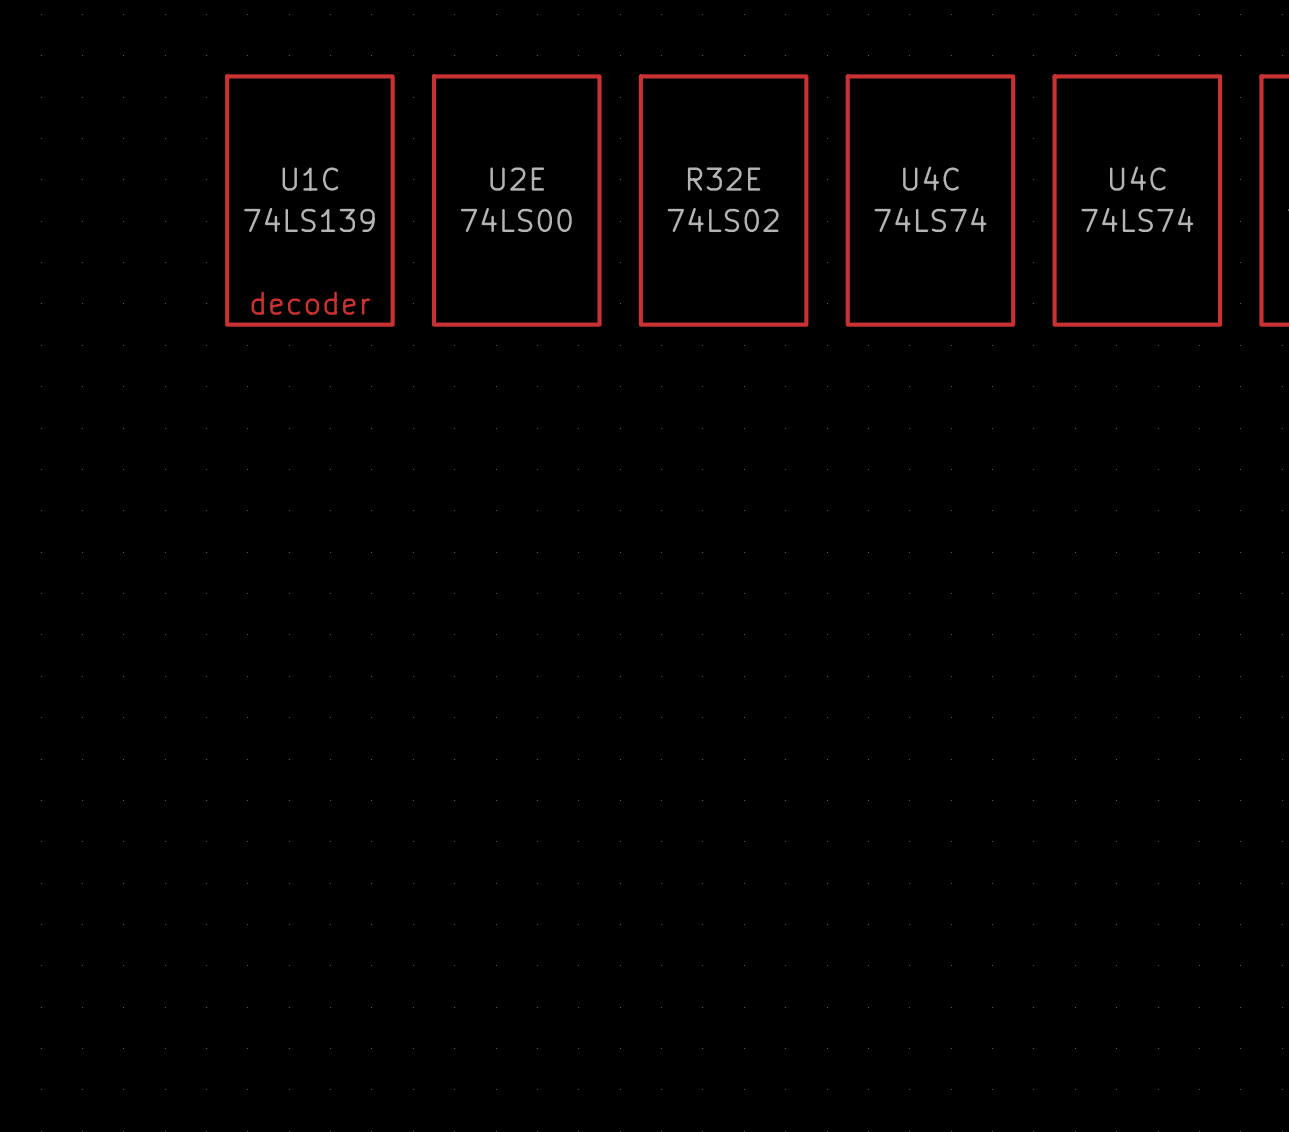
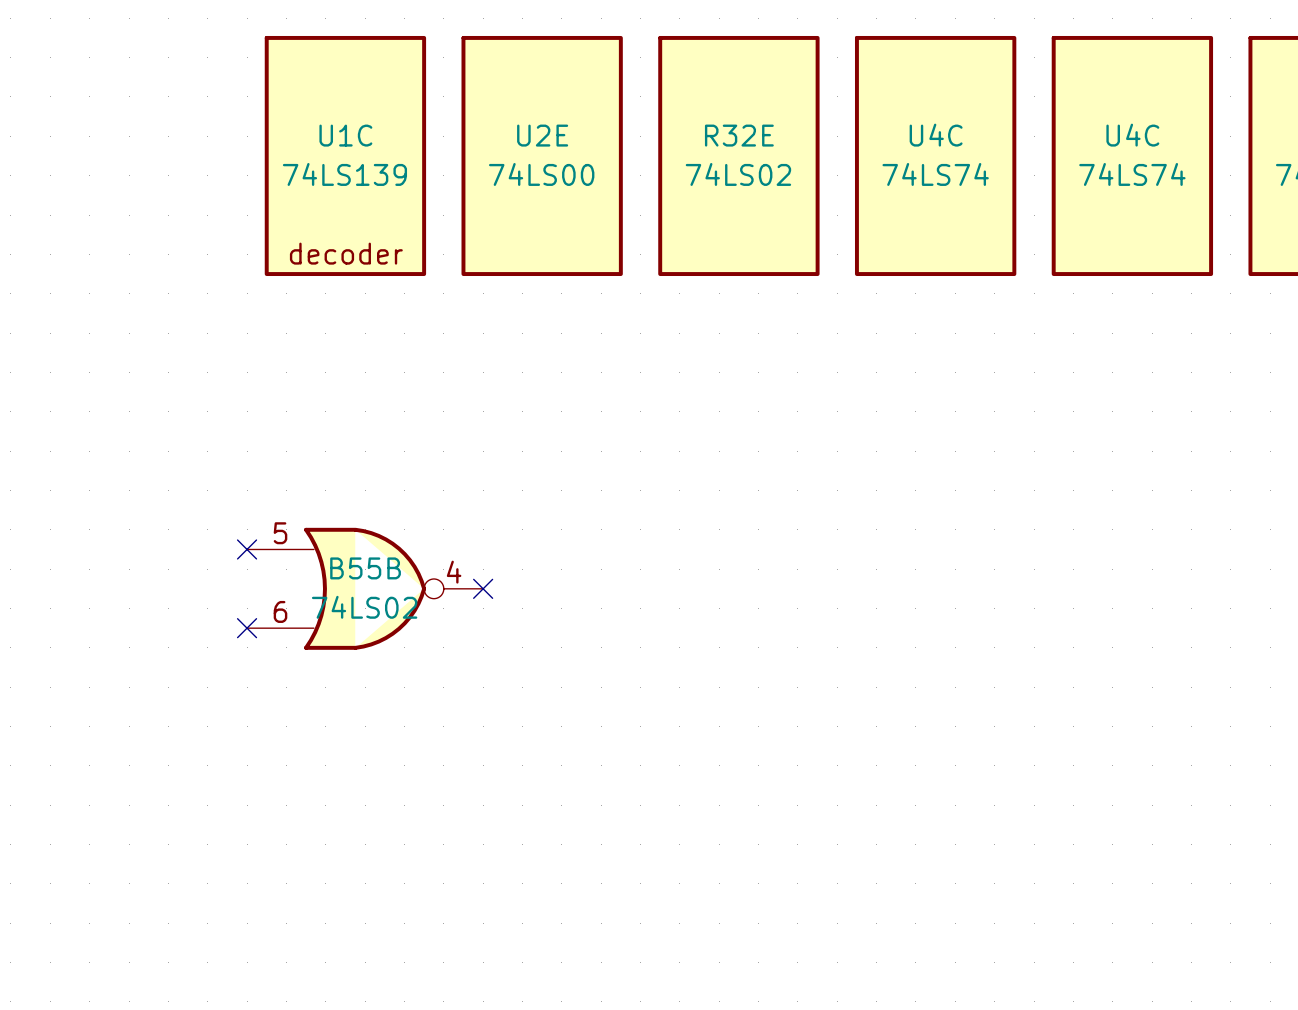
no-connect mark: none -> (247, 549)
B55B: none -> 74LS02 (365, 588)
no-connect mark: none -> (483, 588)
no-connect mark: none -> (247, 628)

